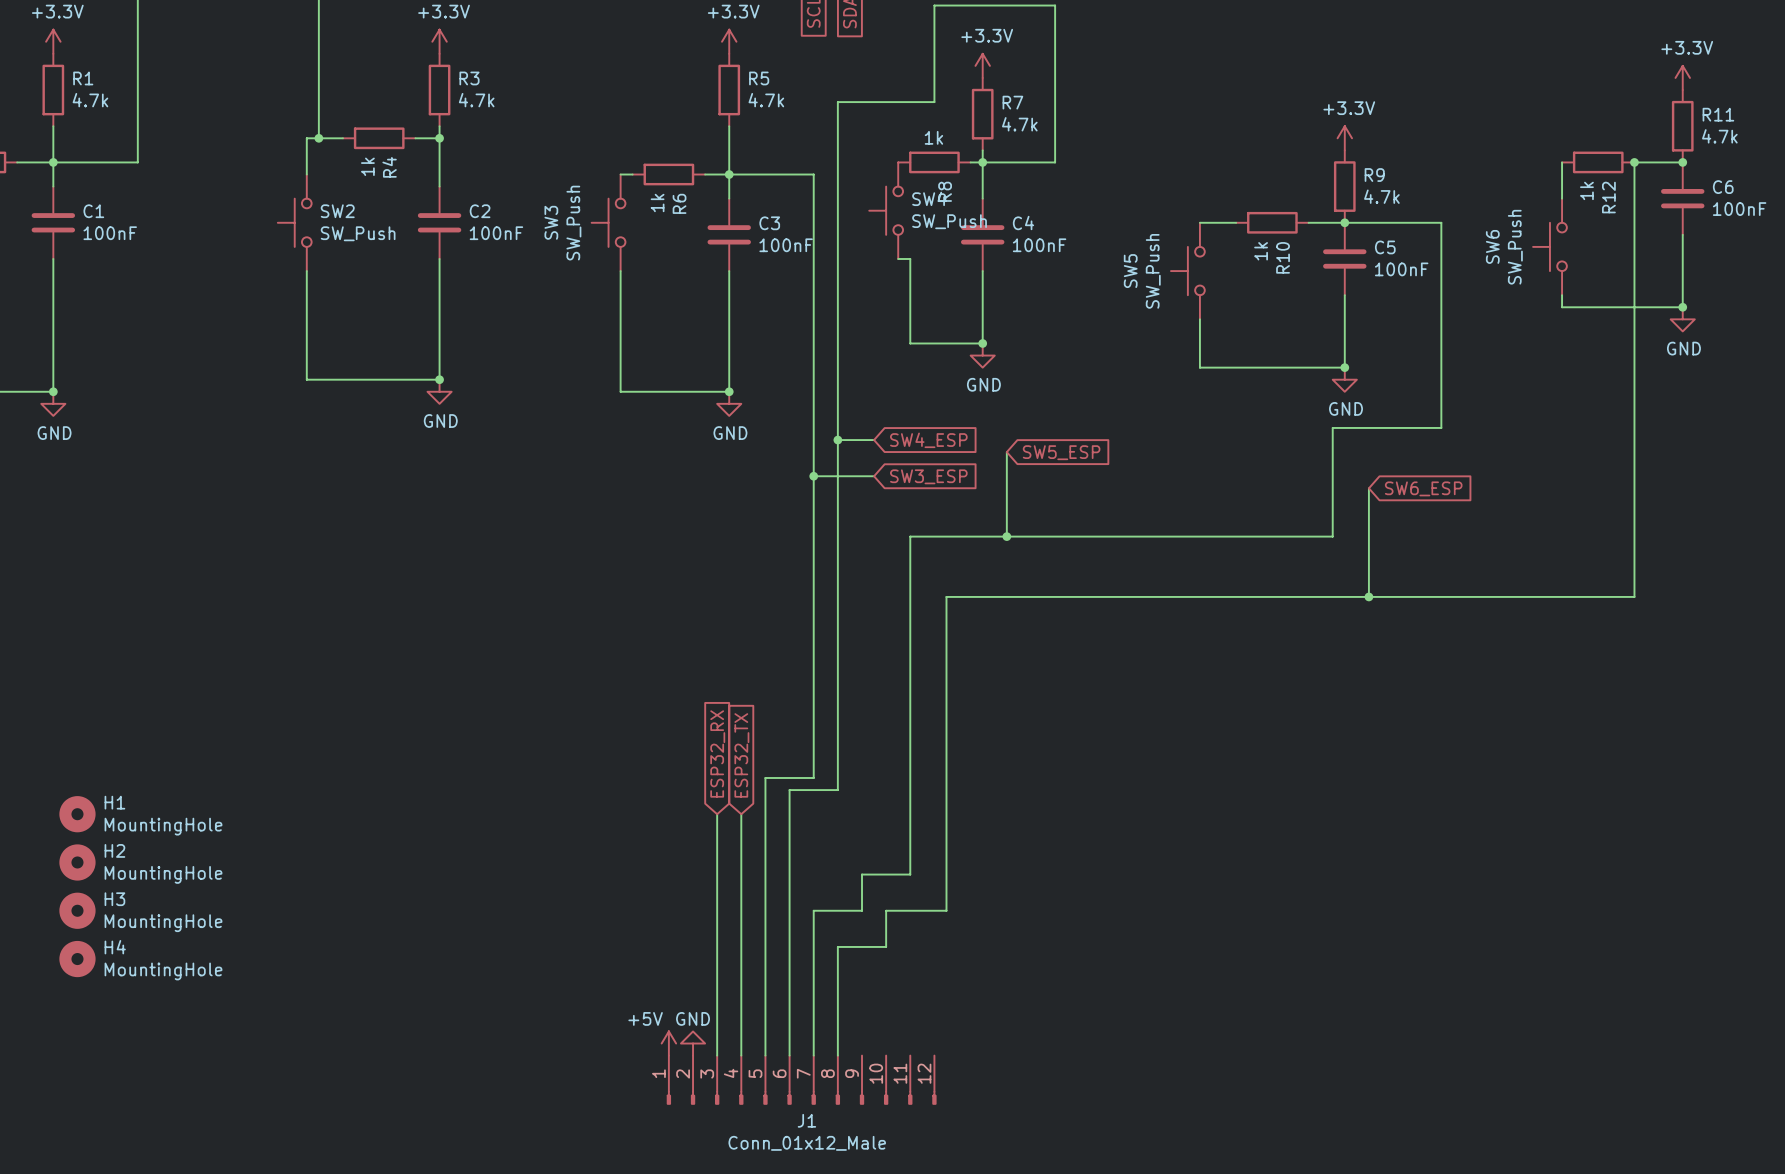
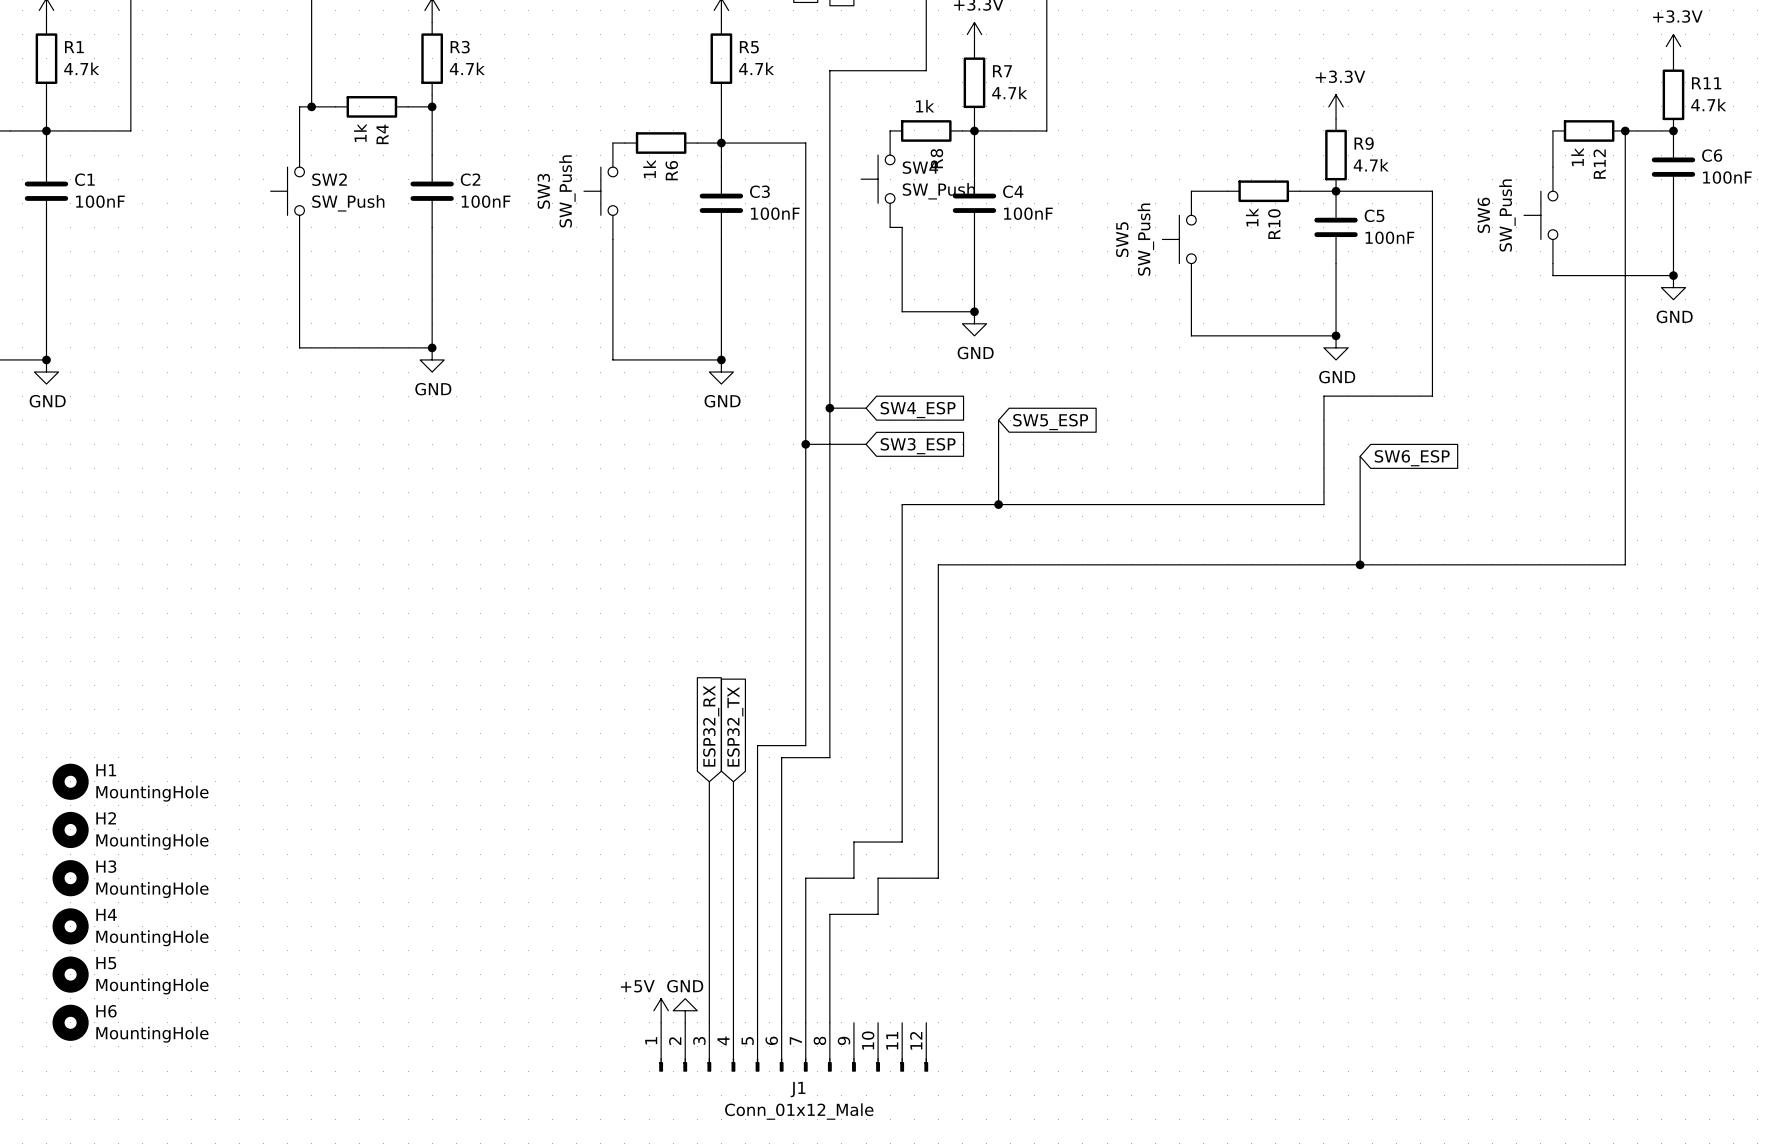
H5: none -> MountingHole (70, 974)
H6: none -> MountingHole (70, 1022)

